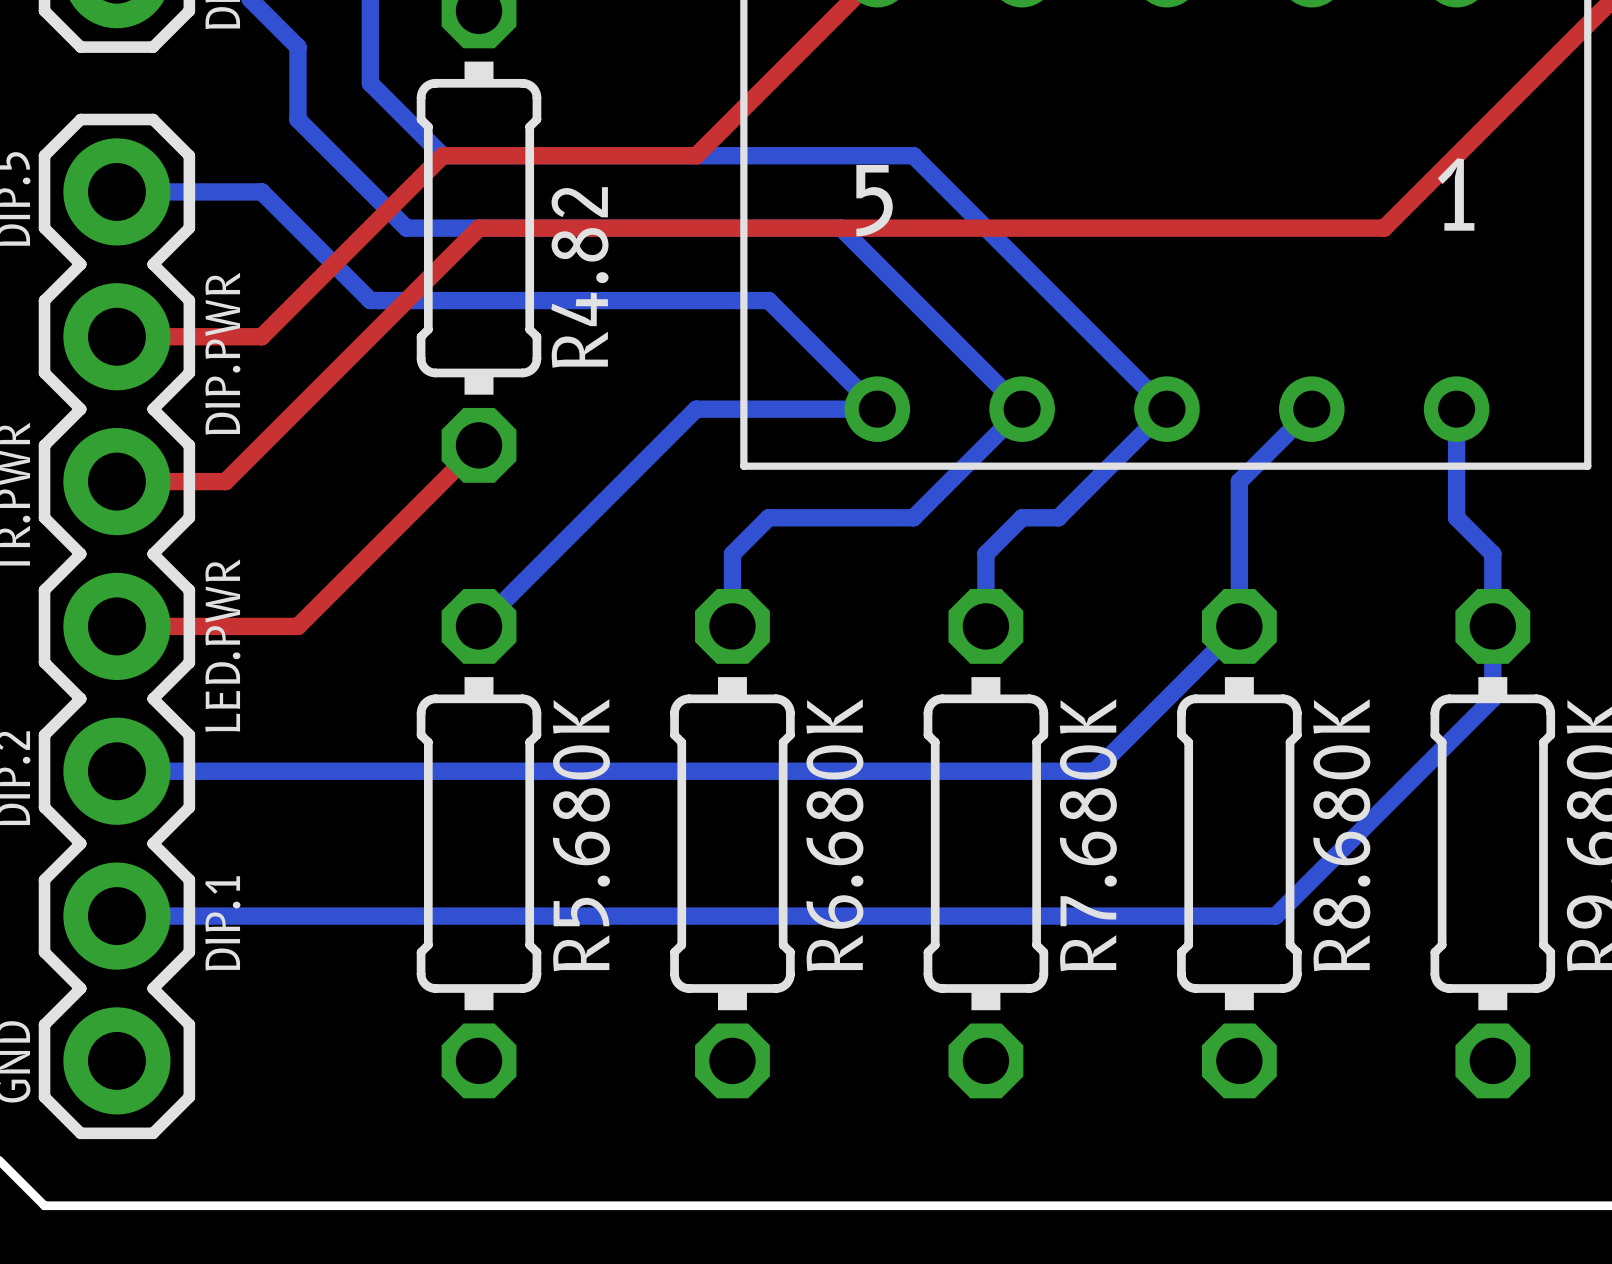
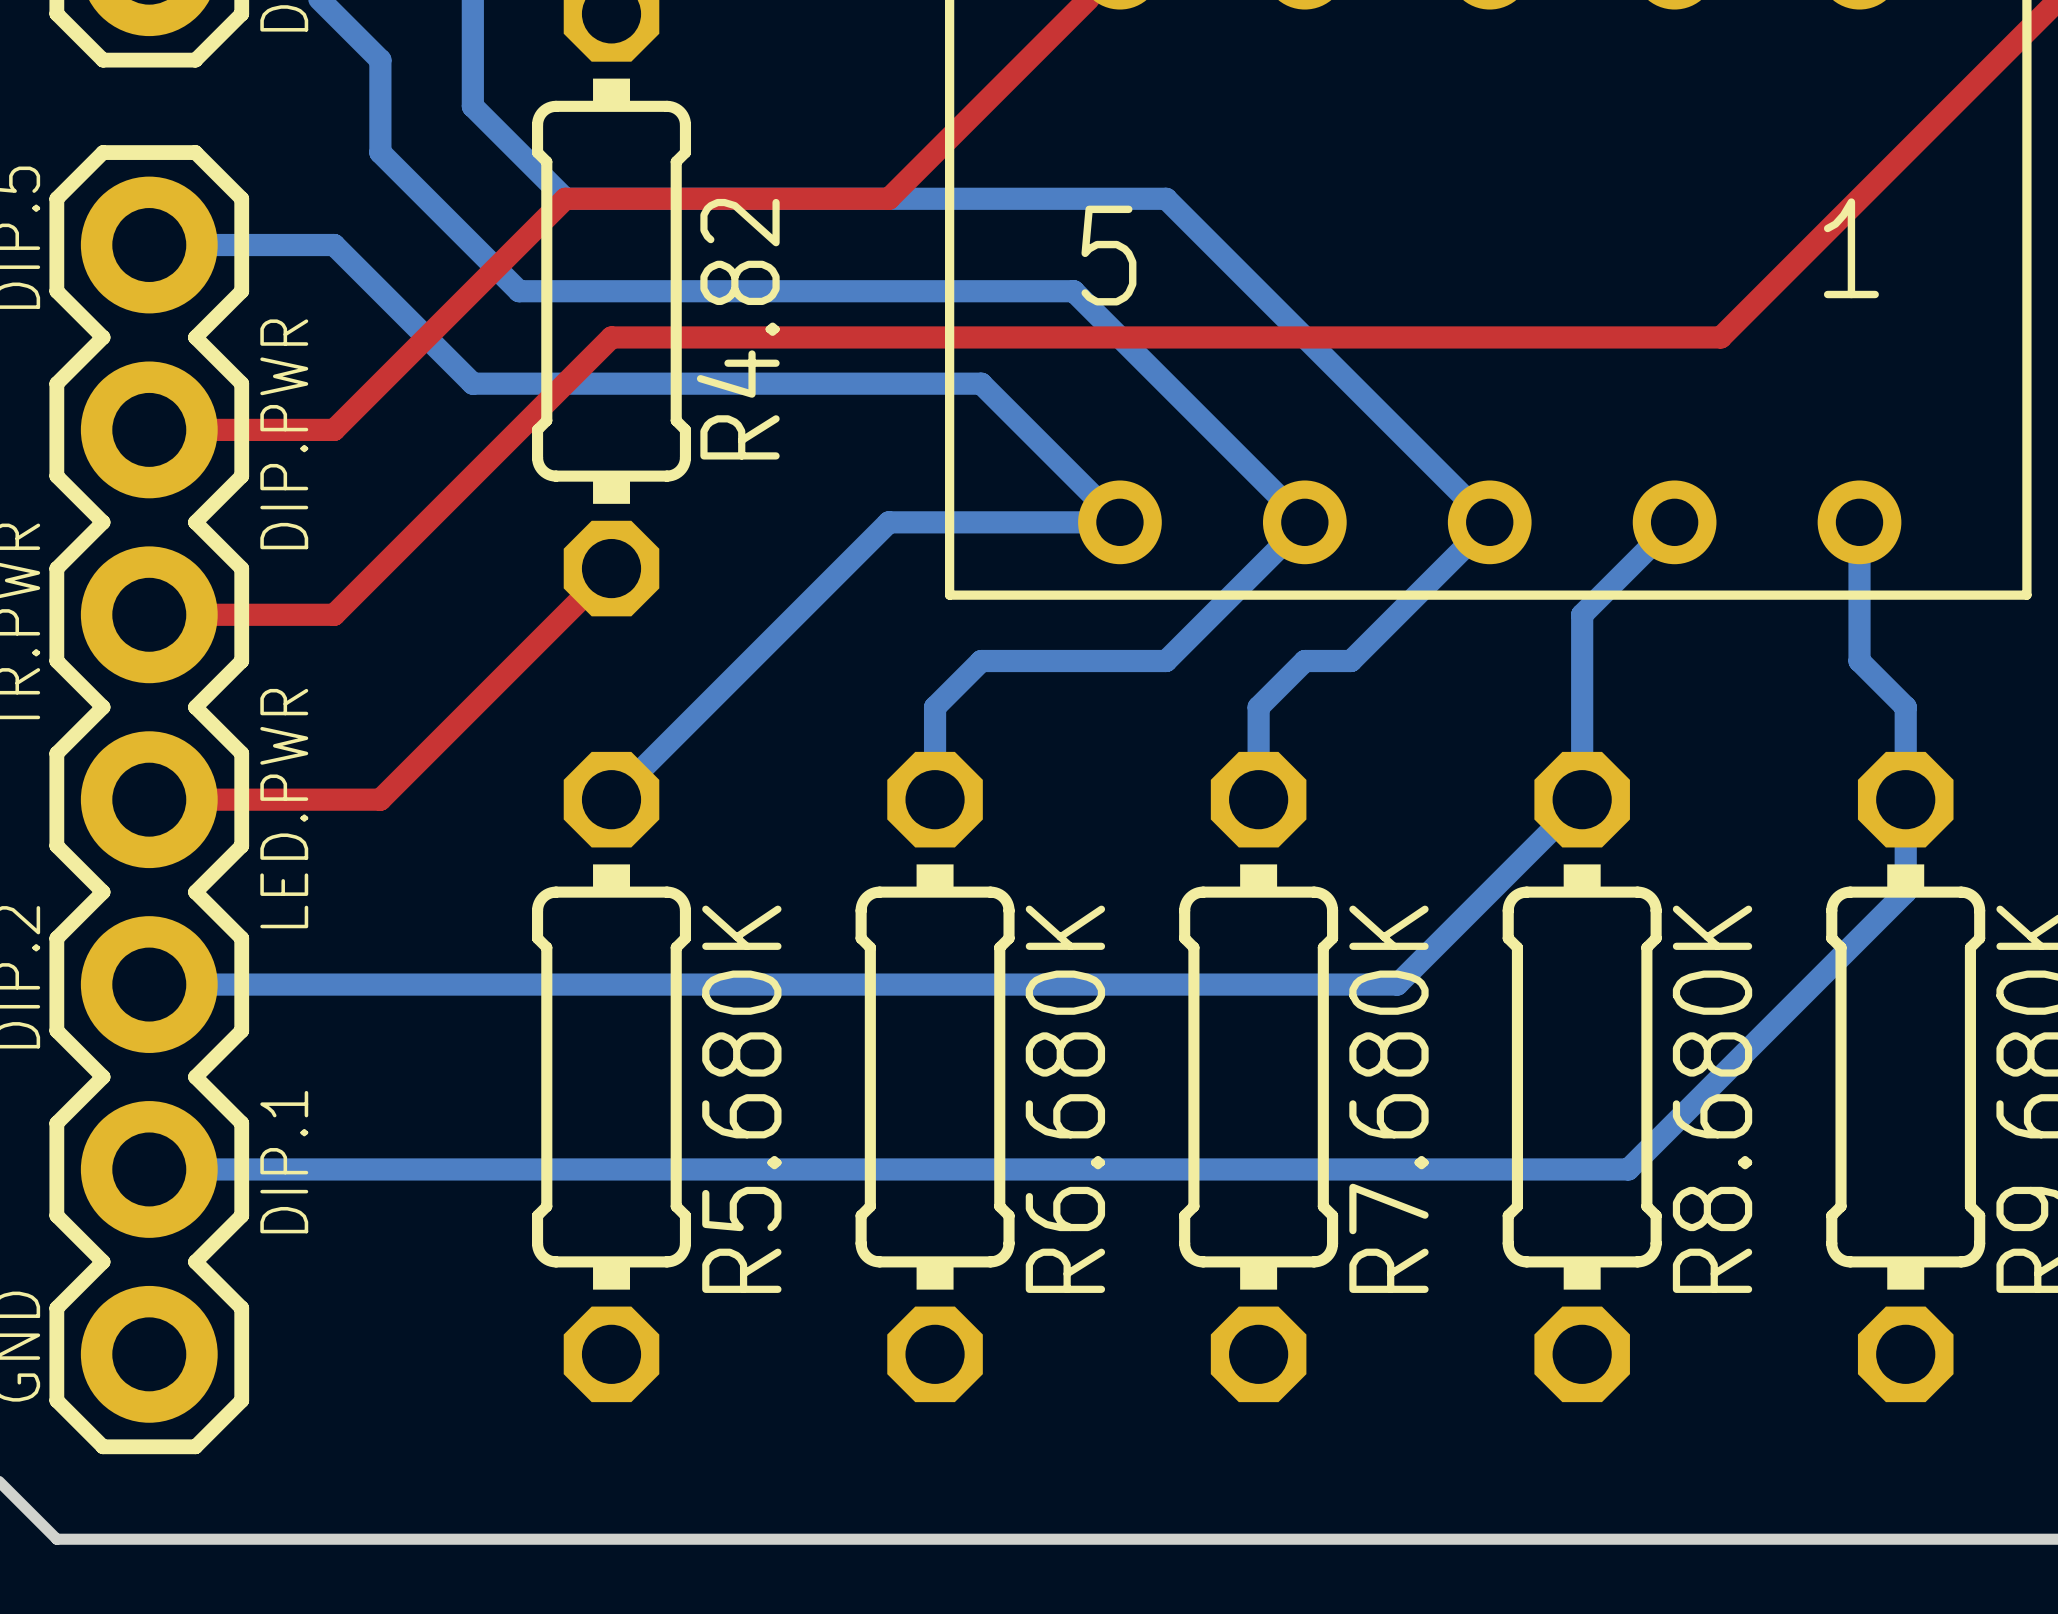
top track: (1384, 228) (479, 228) (225, 481) -> (1767, 291) (1720, 337) (611, 337) (334, 614) (287, 614)

